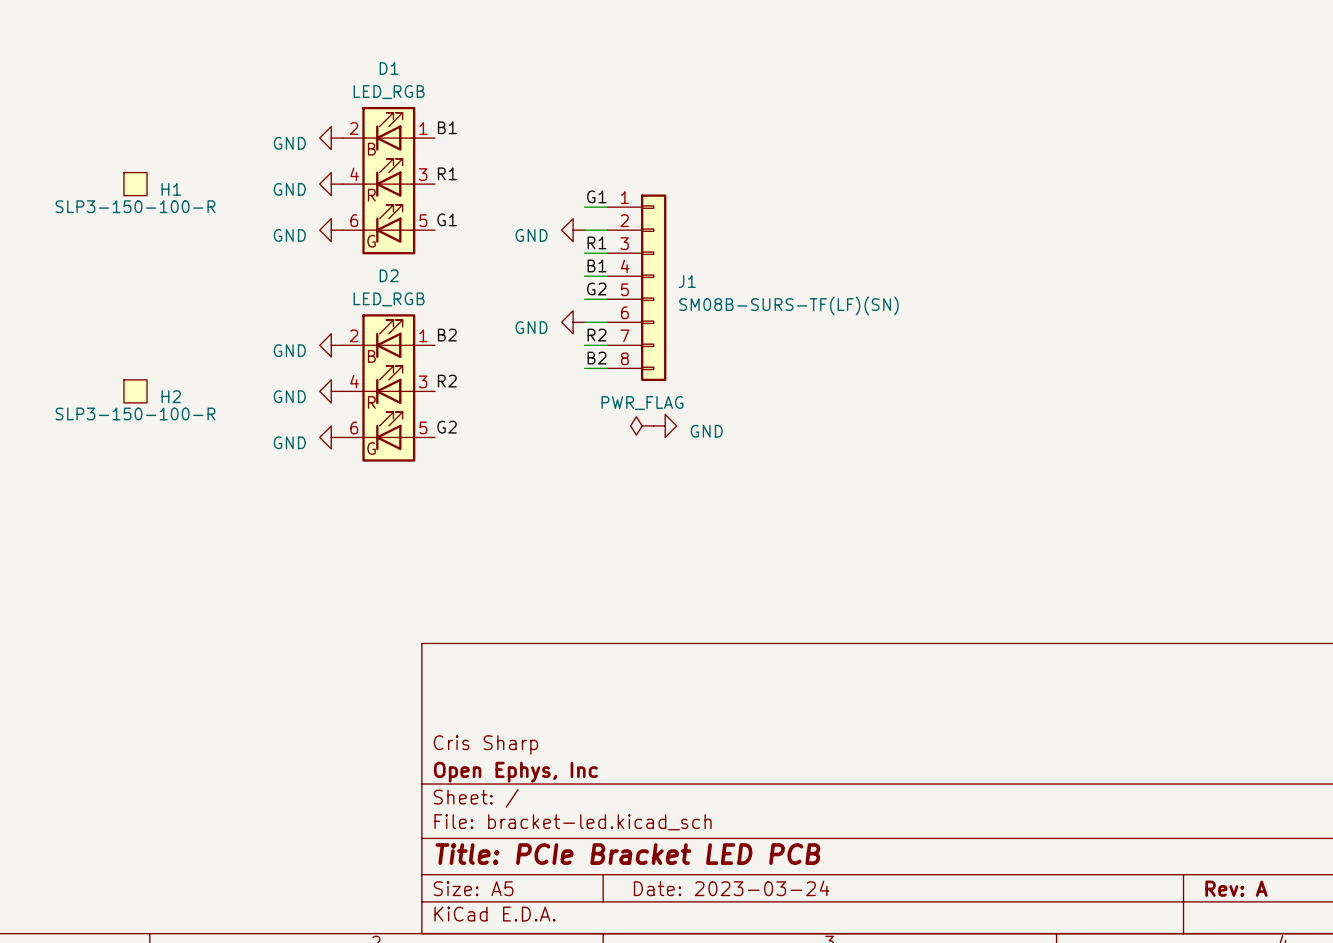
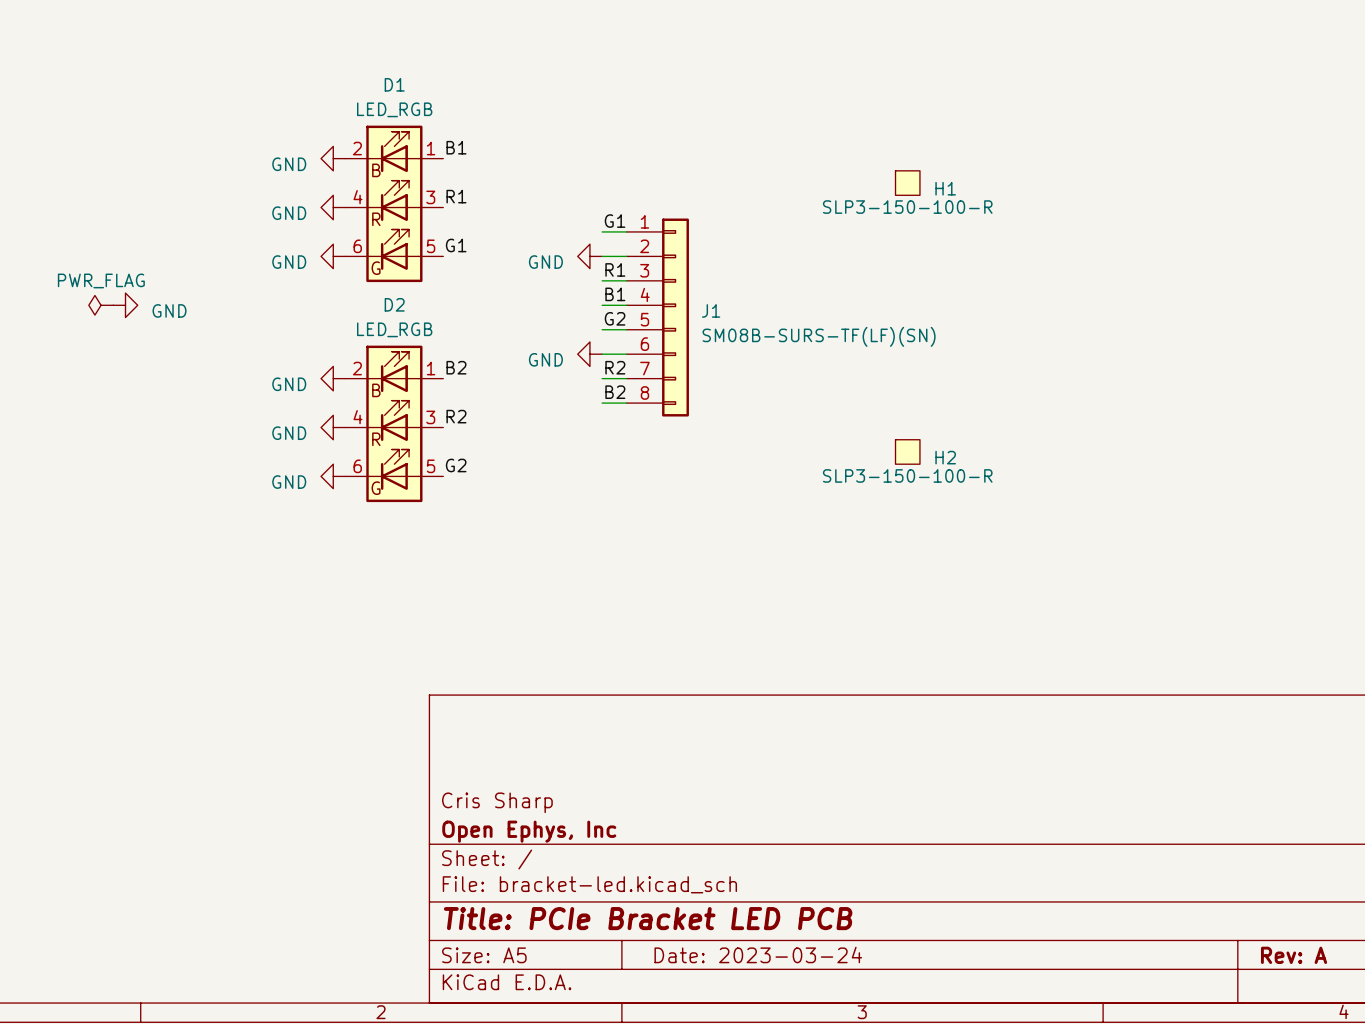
H1 position: (135, 184) -> (907, 183)
power symbol: none -> PWR_FLAG (101, 305)
power symbol: none -> GND (125, 305)
H2 position: (135, 391) -> (907, 451)
power symbol: PWR_FLAG (642, 425) -> none
power symbol: GND (665, 425) -> none

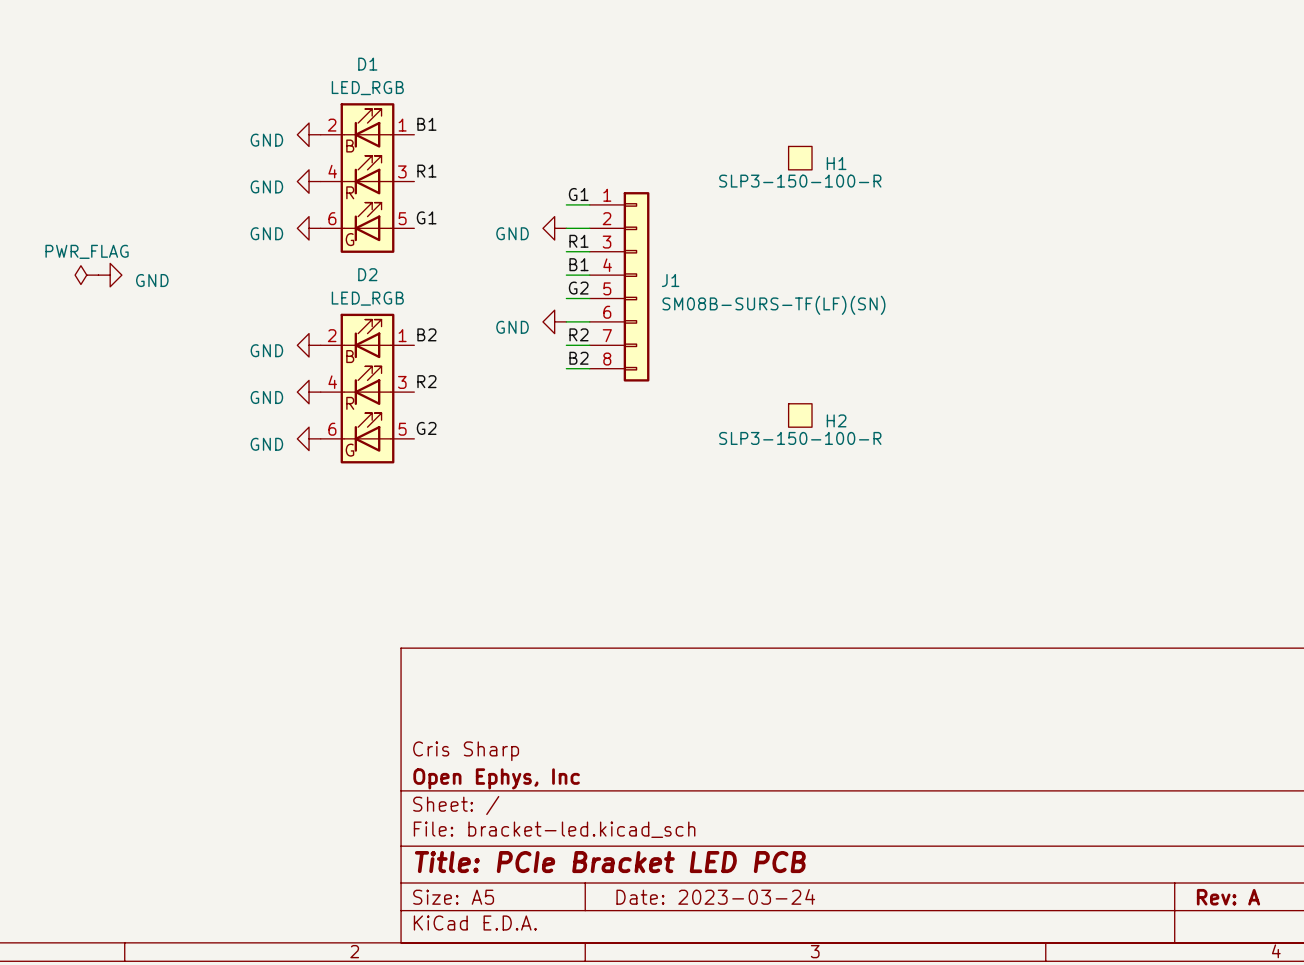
H1 position: (907, 183) -> (800, 158)
H2 position: (907, 451) -> (800, 415)

